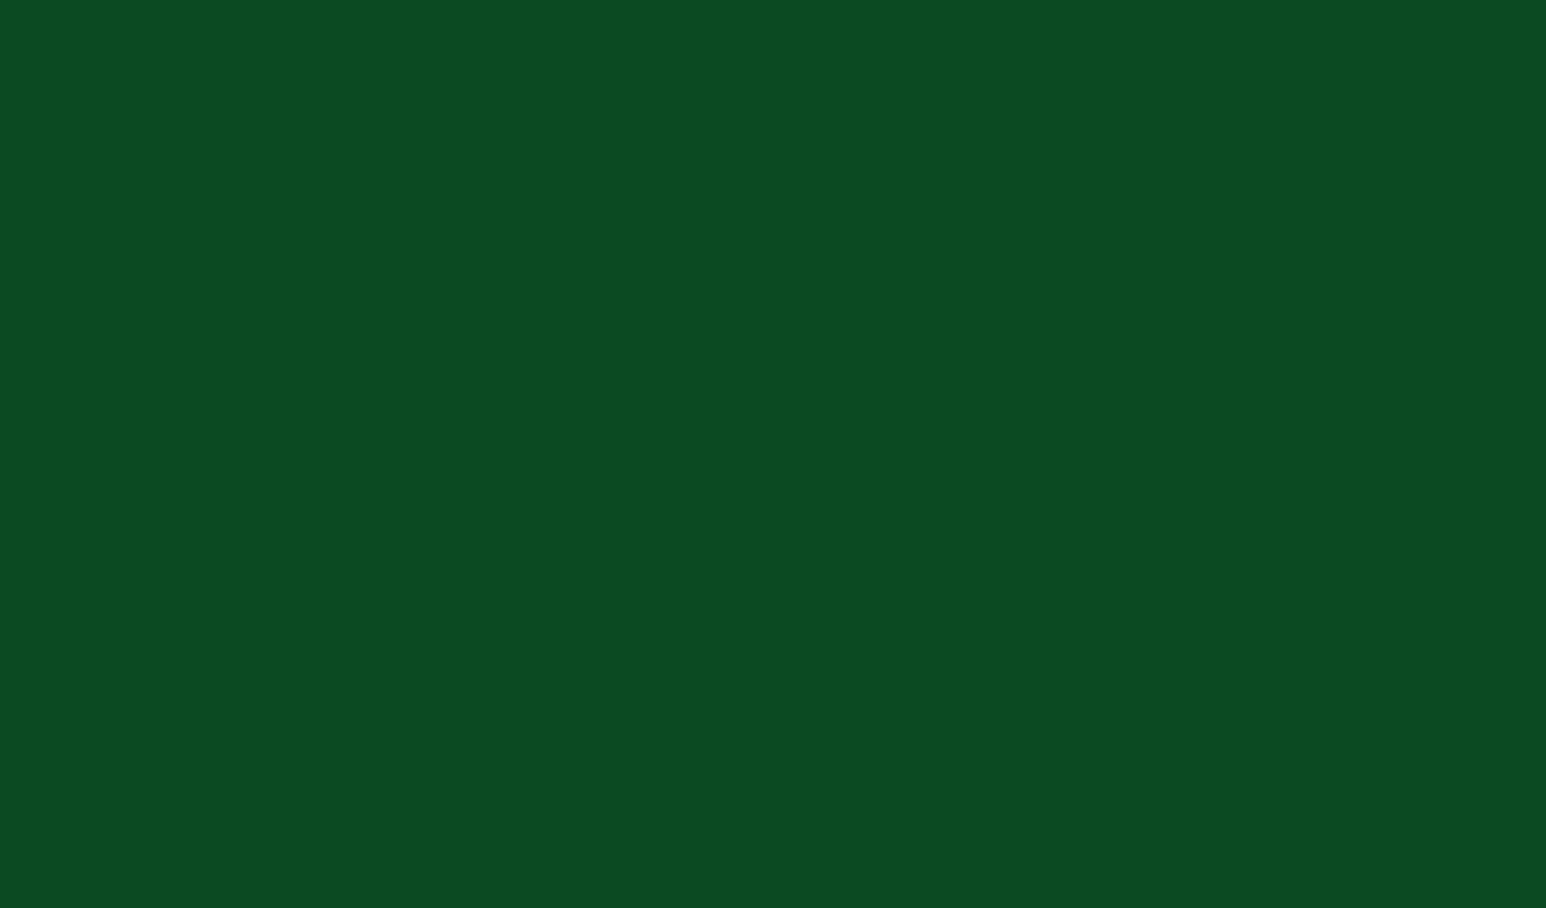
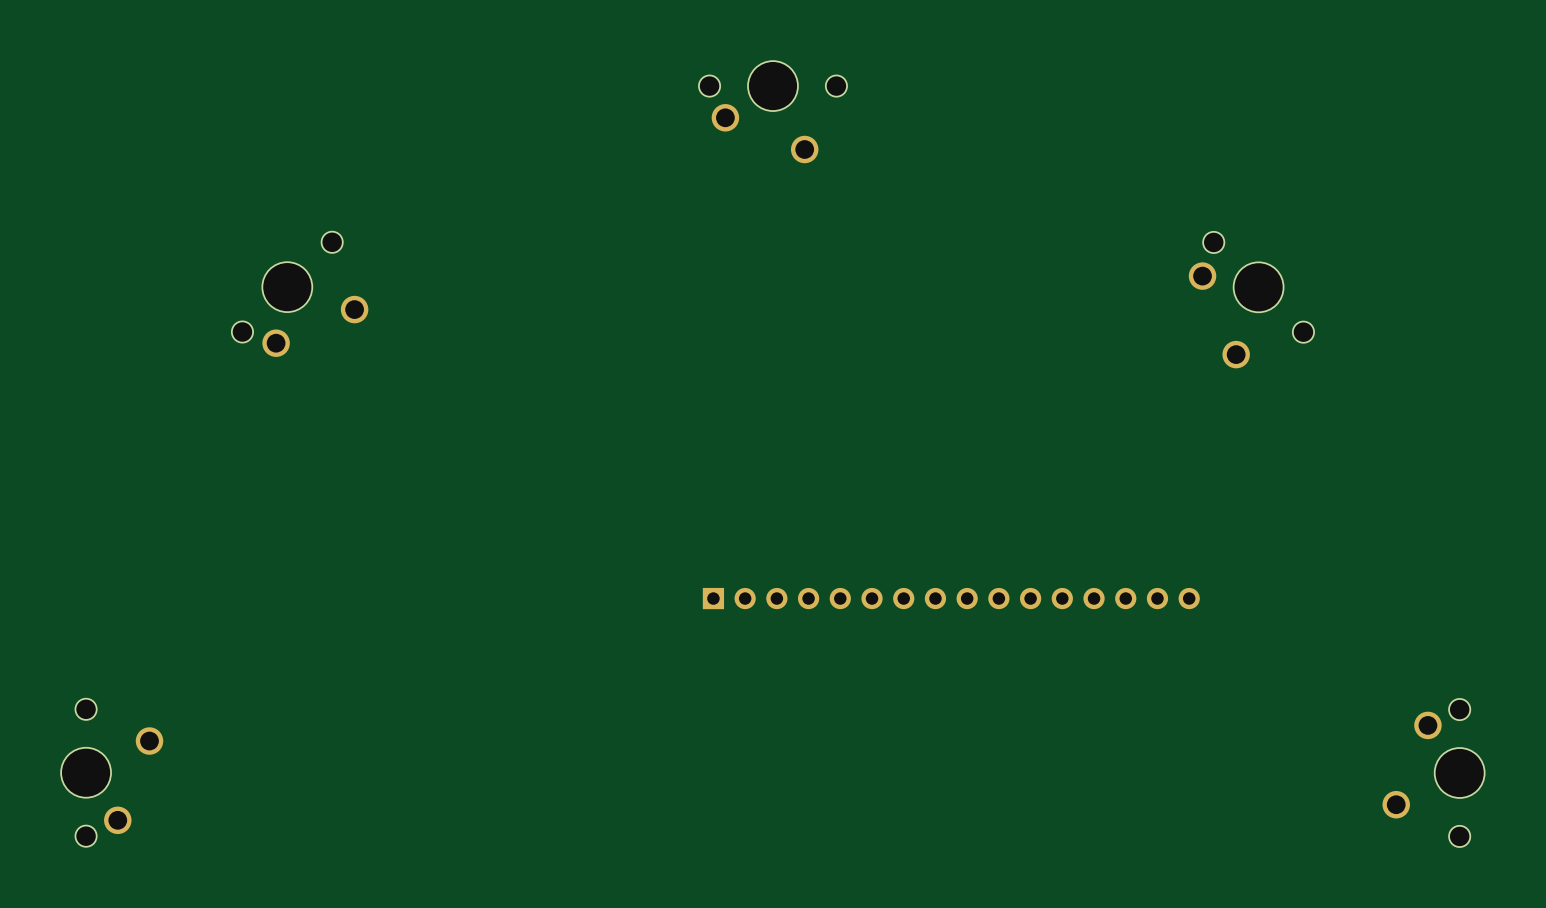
part: none -> (772, 112)
part: none -> (300, 294)
part: none -> (1251, 300)
part: none -> (951, 598)
part: none -> (112, 772)
part: none -> (1433, 772)

